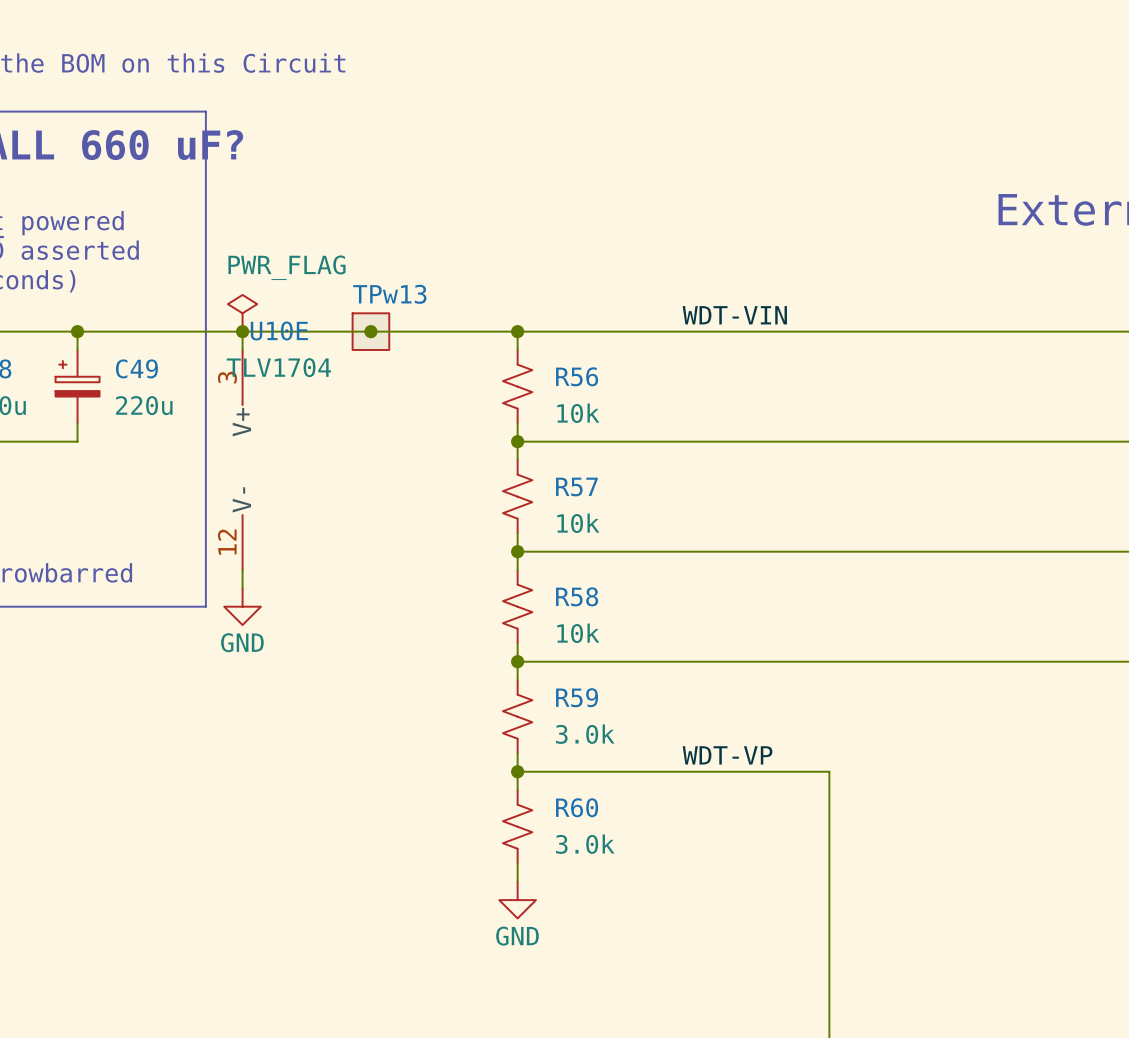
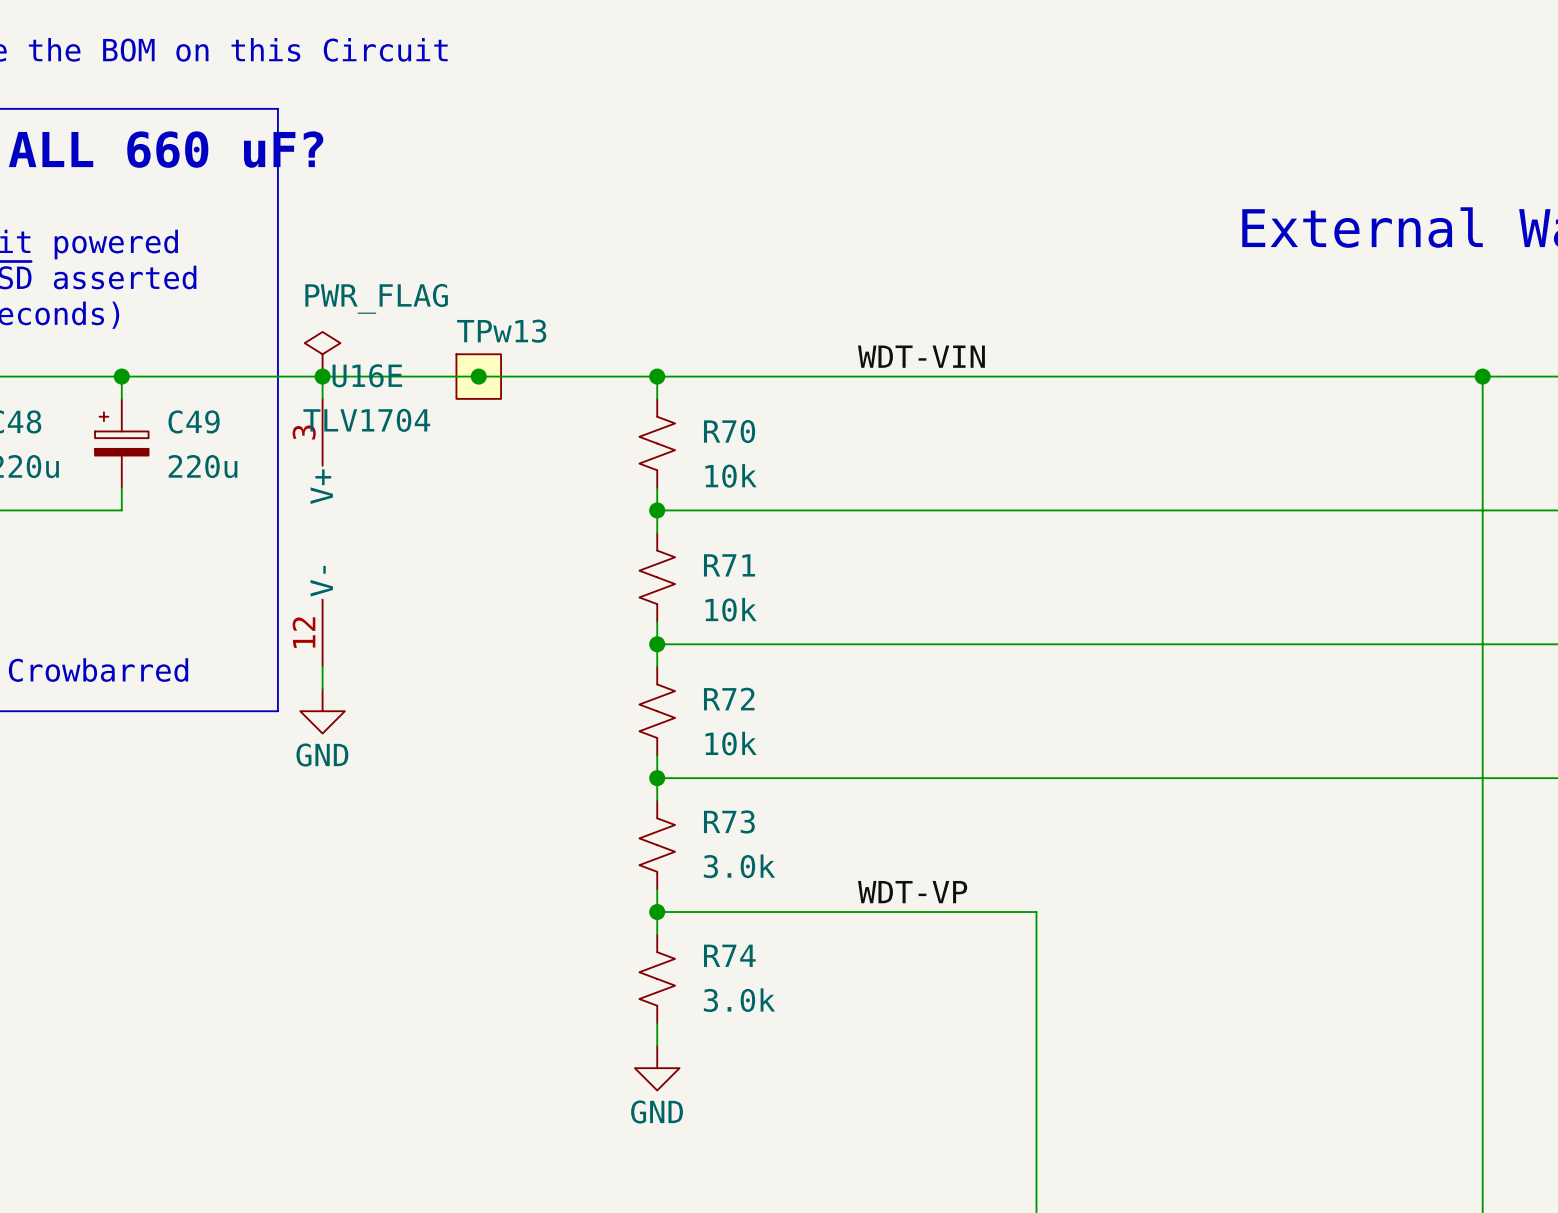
U10E name: U10E (279, 330) -> U16E (367, 375)
R56 name: R56 (577, 376) -> R70 (729, 431)
R57 name: R57 (576, 487) -> R71 (729, 565)
R58 name: R58 (577, 596) -> R72 (729, 699)
R59 name: R59 (577, 697) -> R73 (729, 821)
R60 name: R60 (577, 807) -> R74 (729, 955)

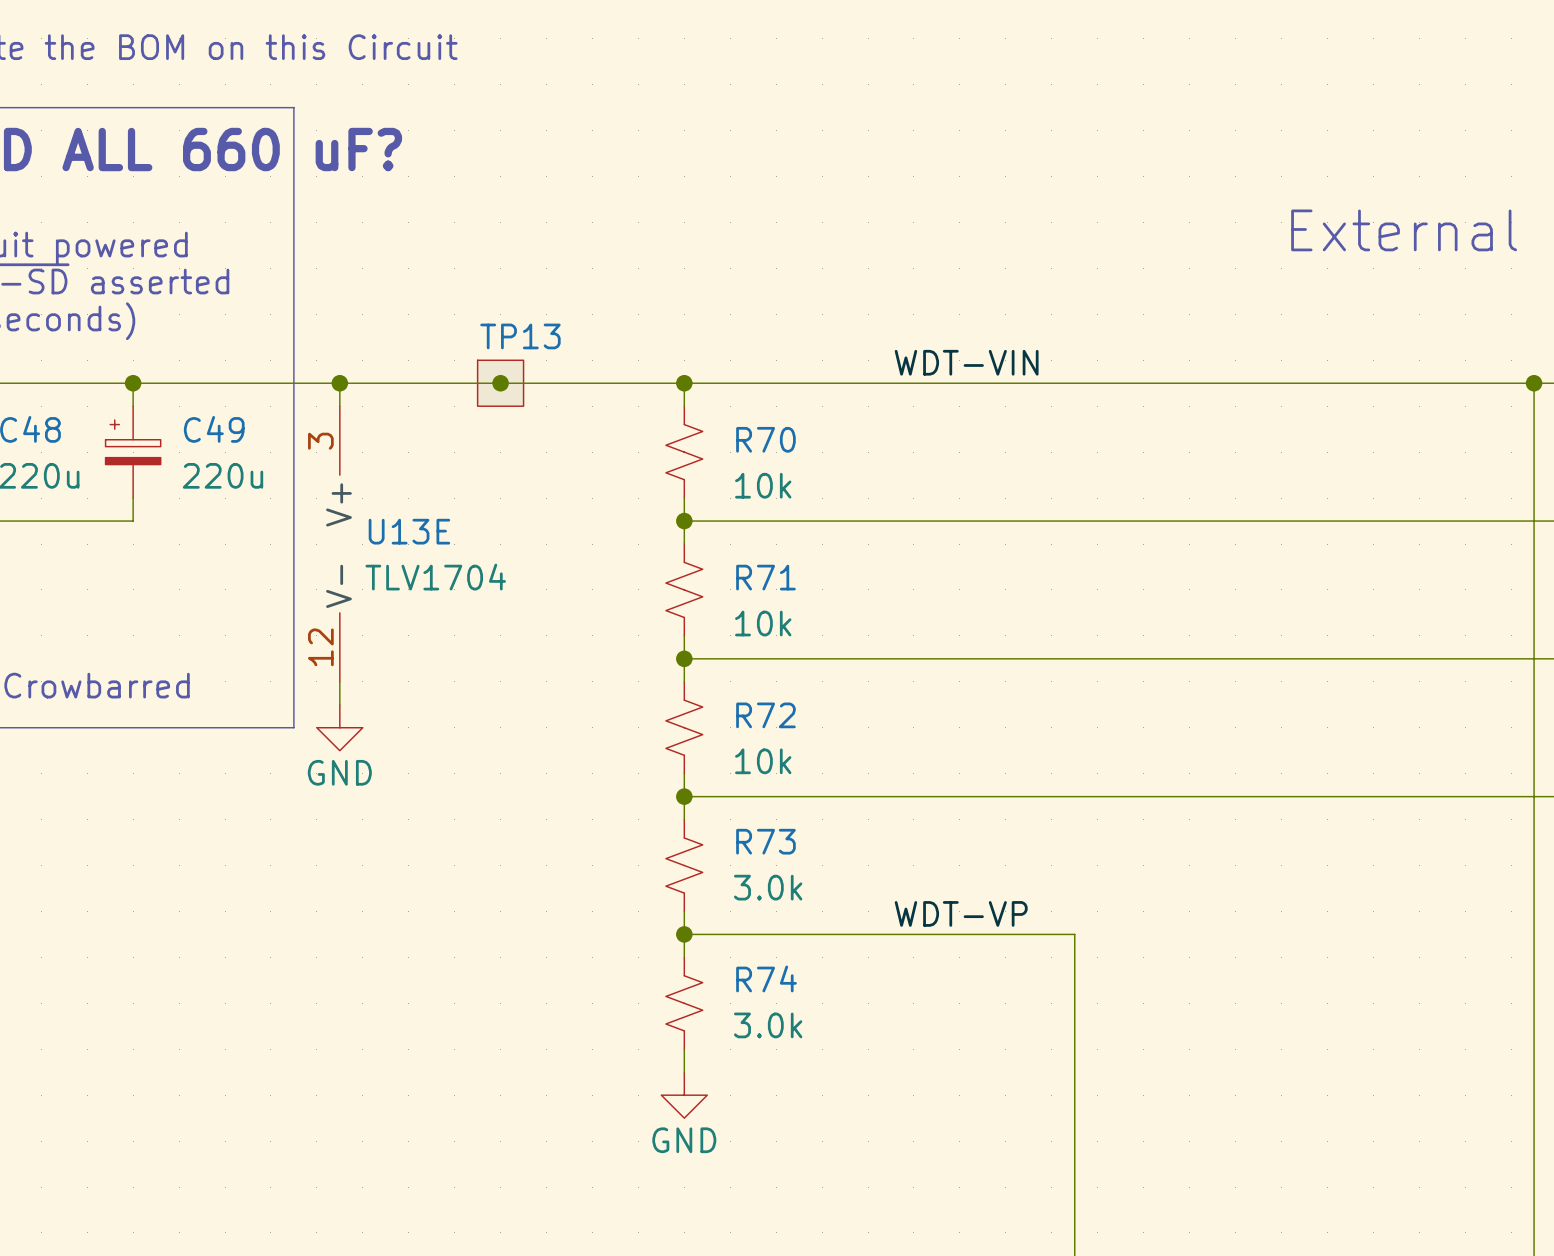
TPw13 name: TPw13 (501, 331) -> TP13 (520, 336)
power symbol: PWR_FLAG (322, 354) -> none
U16E name: U16E (367, 375) -> U13E (409, 531)
U16E value position: TLV1704 (366, 420) -> TLV1704 (435, 577)

